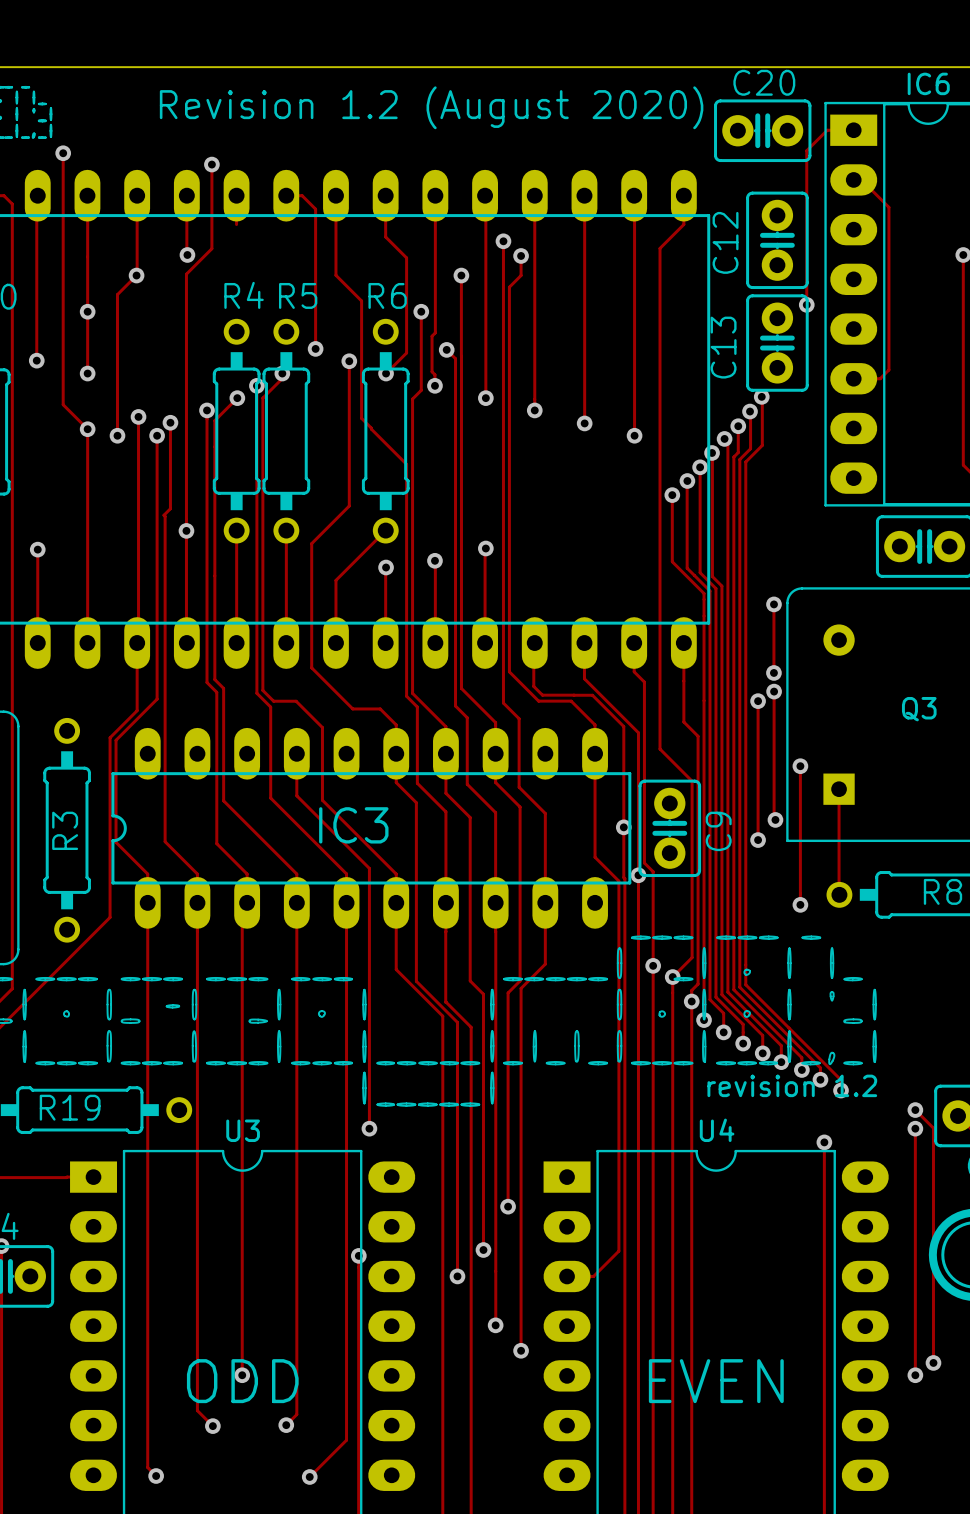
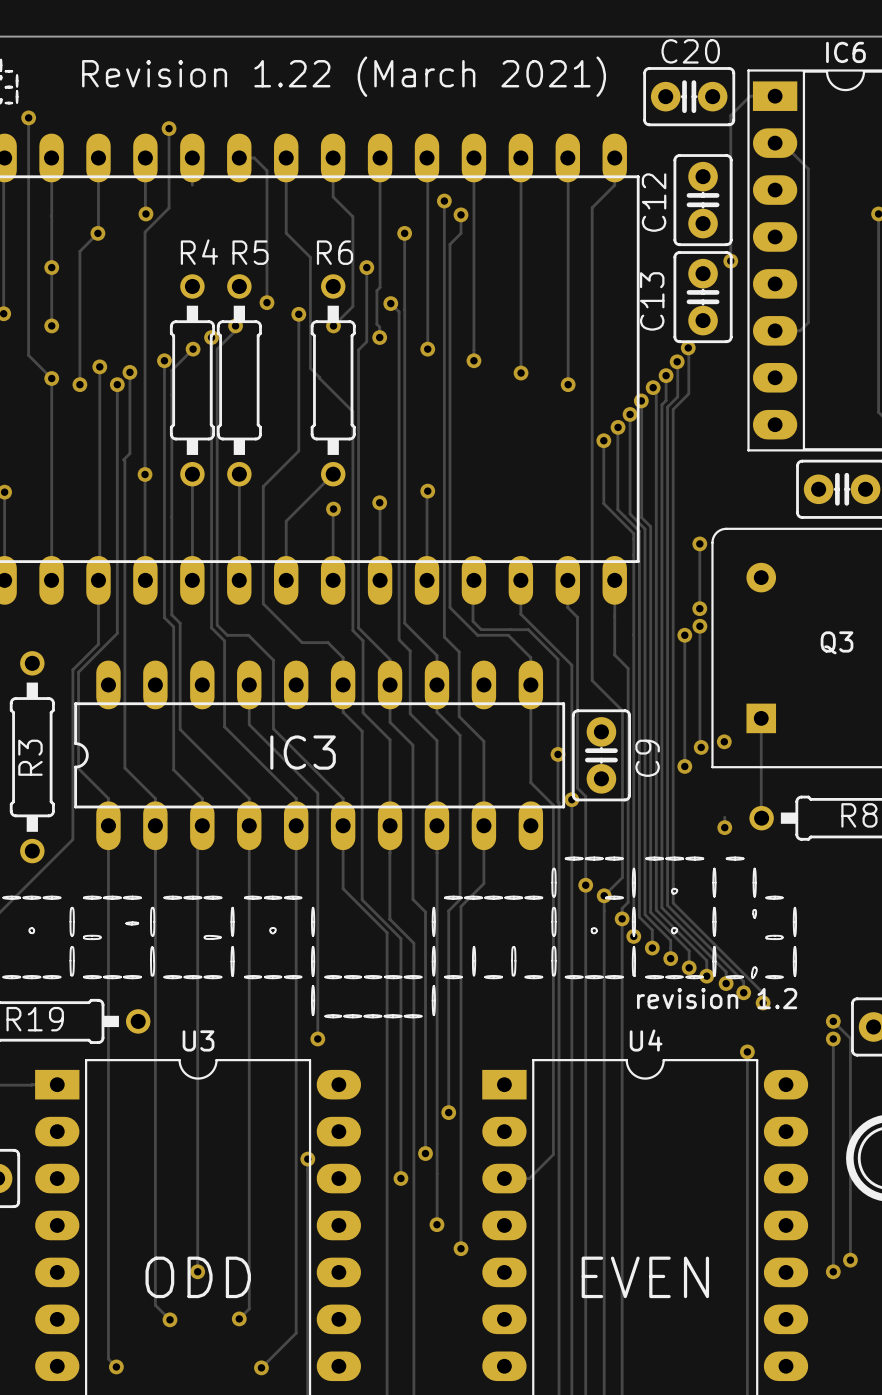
text: Revision 1.2 (August 2020) (431, 107) -> Revision 1.22 (March 2021) (344, 76)
track: (800, 766) (800, 893) -> none
via position: (800, 766) -> (724, 741)

